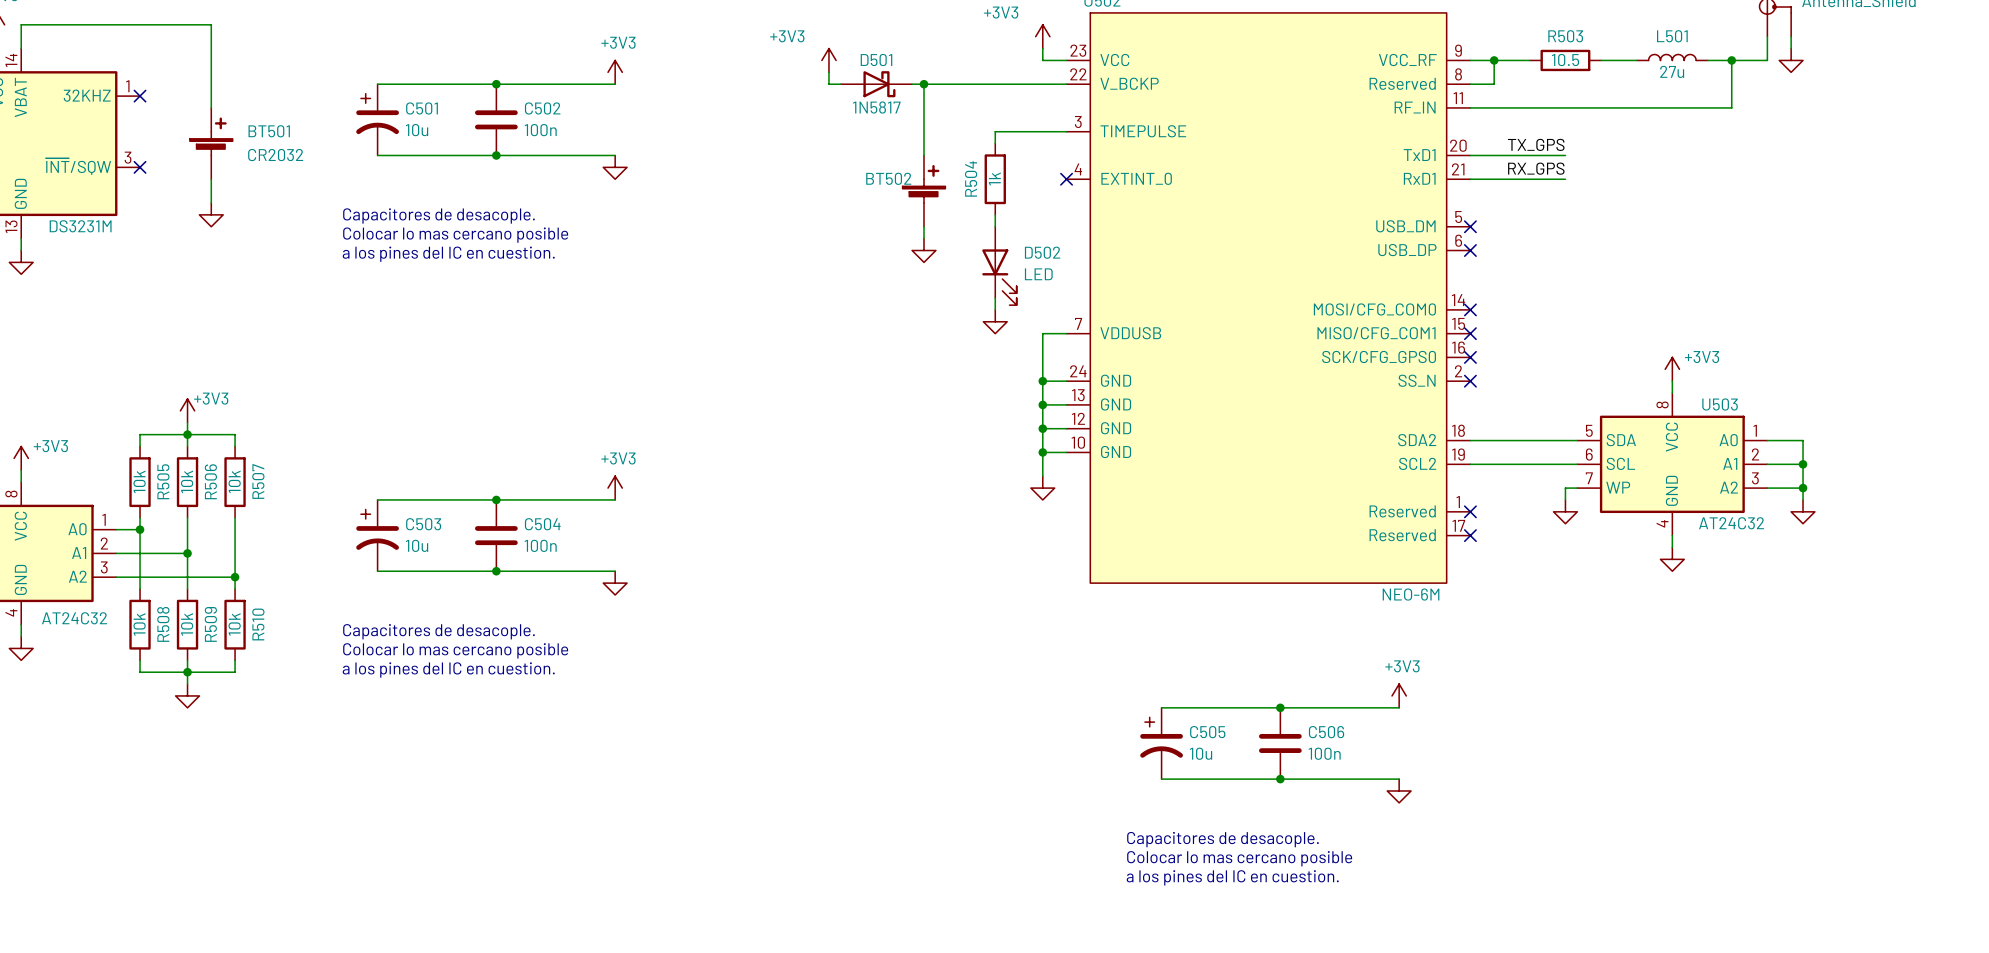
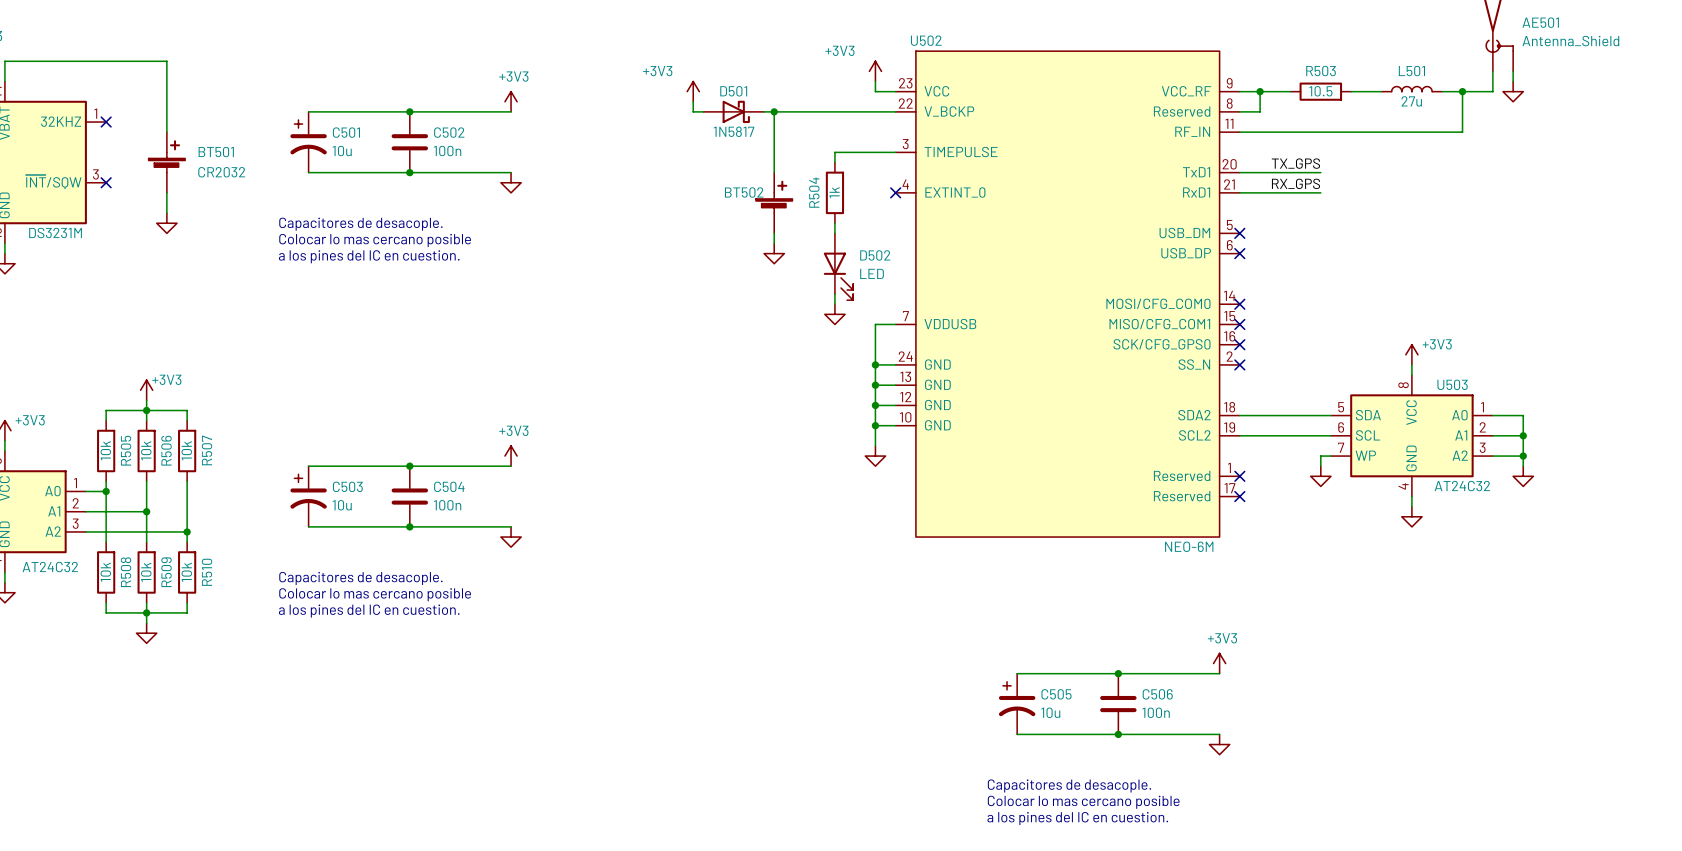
power symbol position: +3V3 (1399, 695) -> +3V3 (1219, 663)
wire: (1161, 707) (1399, 707) -> (1017, 673) (1219, 673)
junction: (1280, 707) -> none
C505 position: (1161, 743) -> (1017, 704)
C506 position: (1280, 743) -> (1118, 704)
junction: none -> (1118, 673)
wire: (1161, 779) (1399, 779) -> (1017, 734) (1219, 734)
junction: (1280, 779) -> none
power symbol position: (1399, 790) -> (1219, 744)
junction: none -> (1118, 734)
text position: Capacitores de desacople. (1222, 839) -> Capacitores de desacople. (1069, 785)
text position: Colocar lo mas cercano posible (1239, 858) -> Colocar lo mas cercano posible (1083, 802)
text position: a los pines del IC en cuestion. (1232, 877) -> a los pines del IC en cuestion. (1077, 818)

